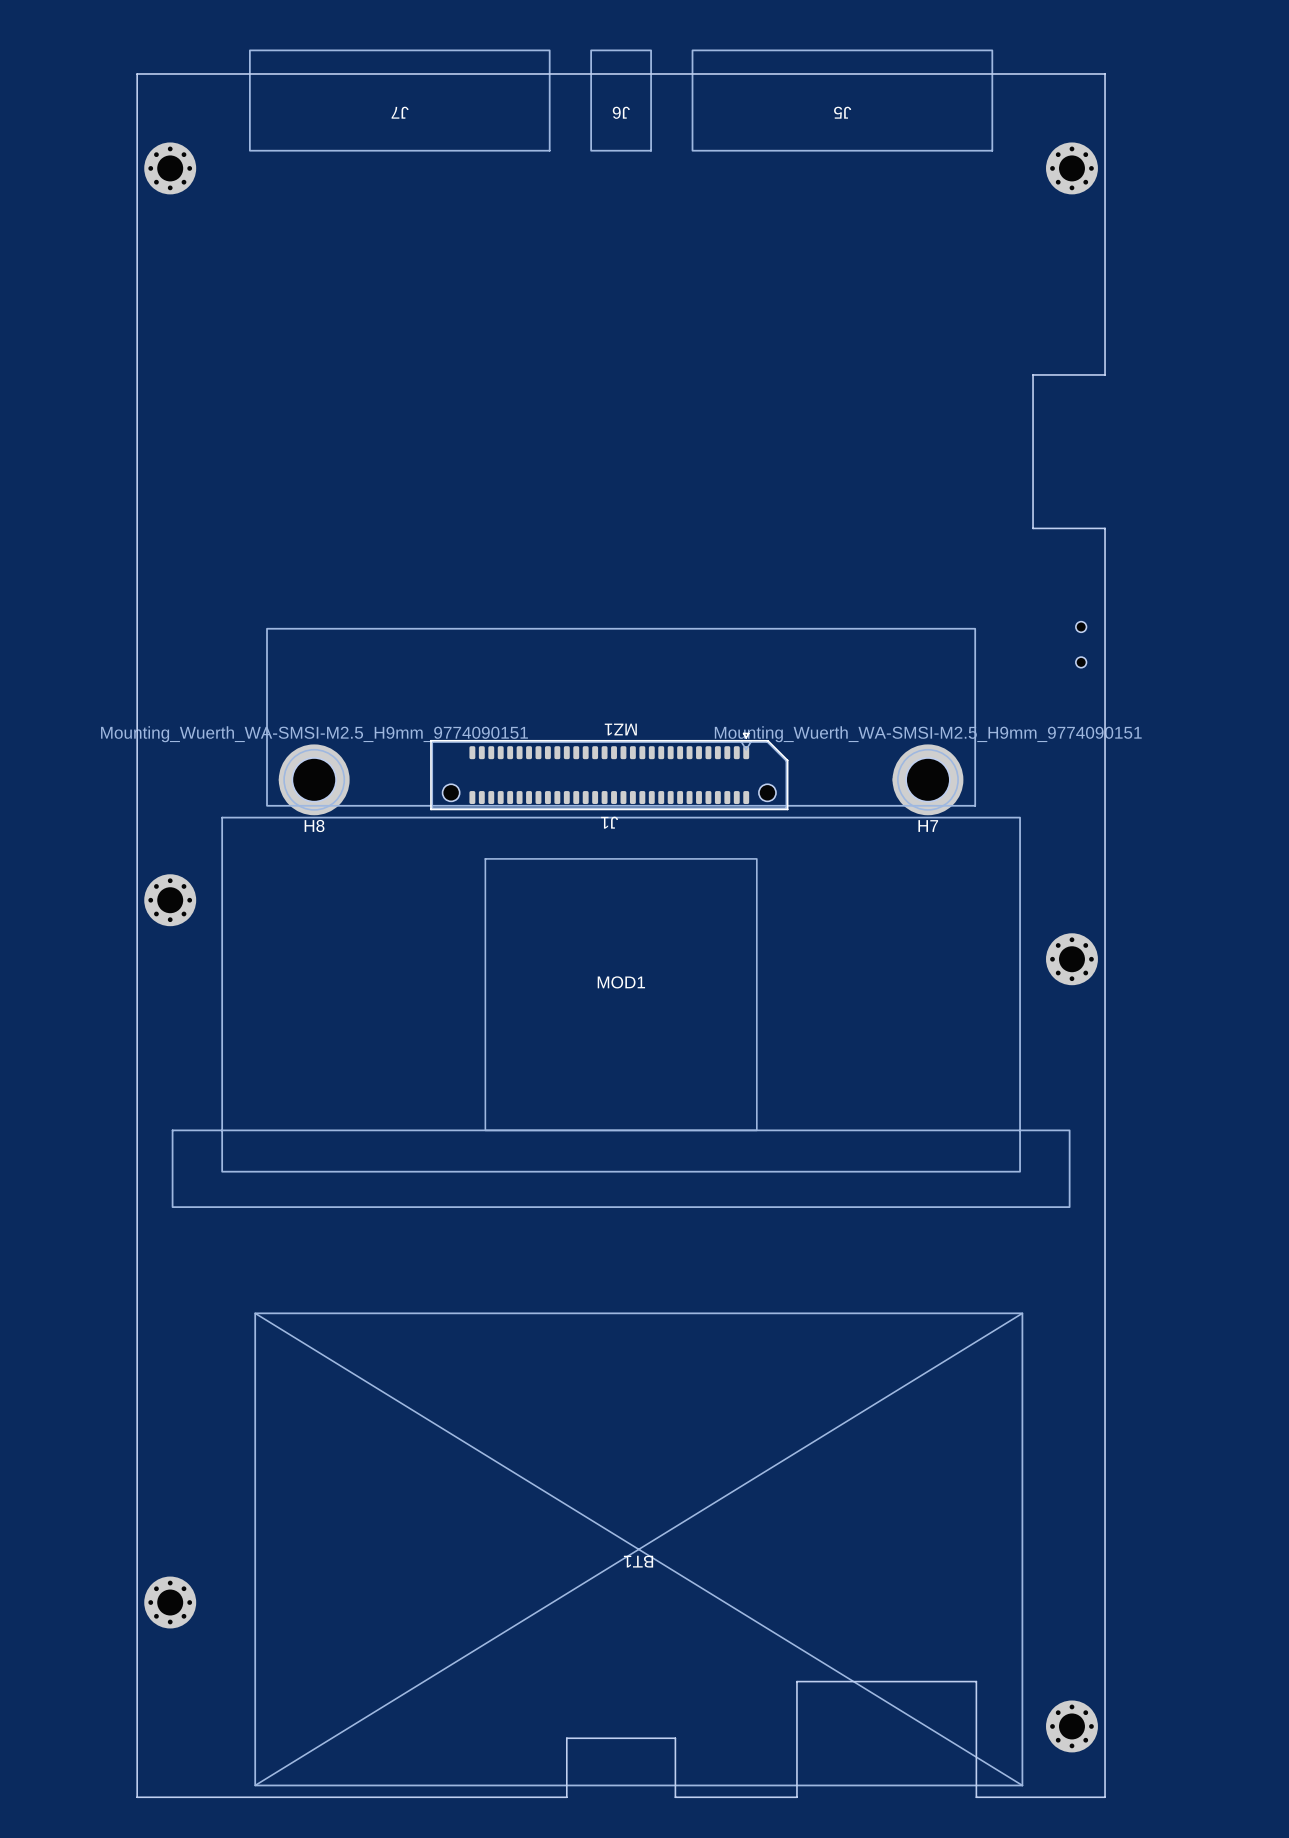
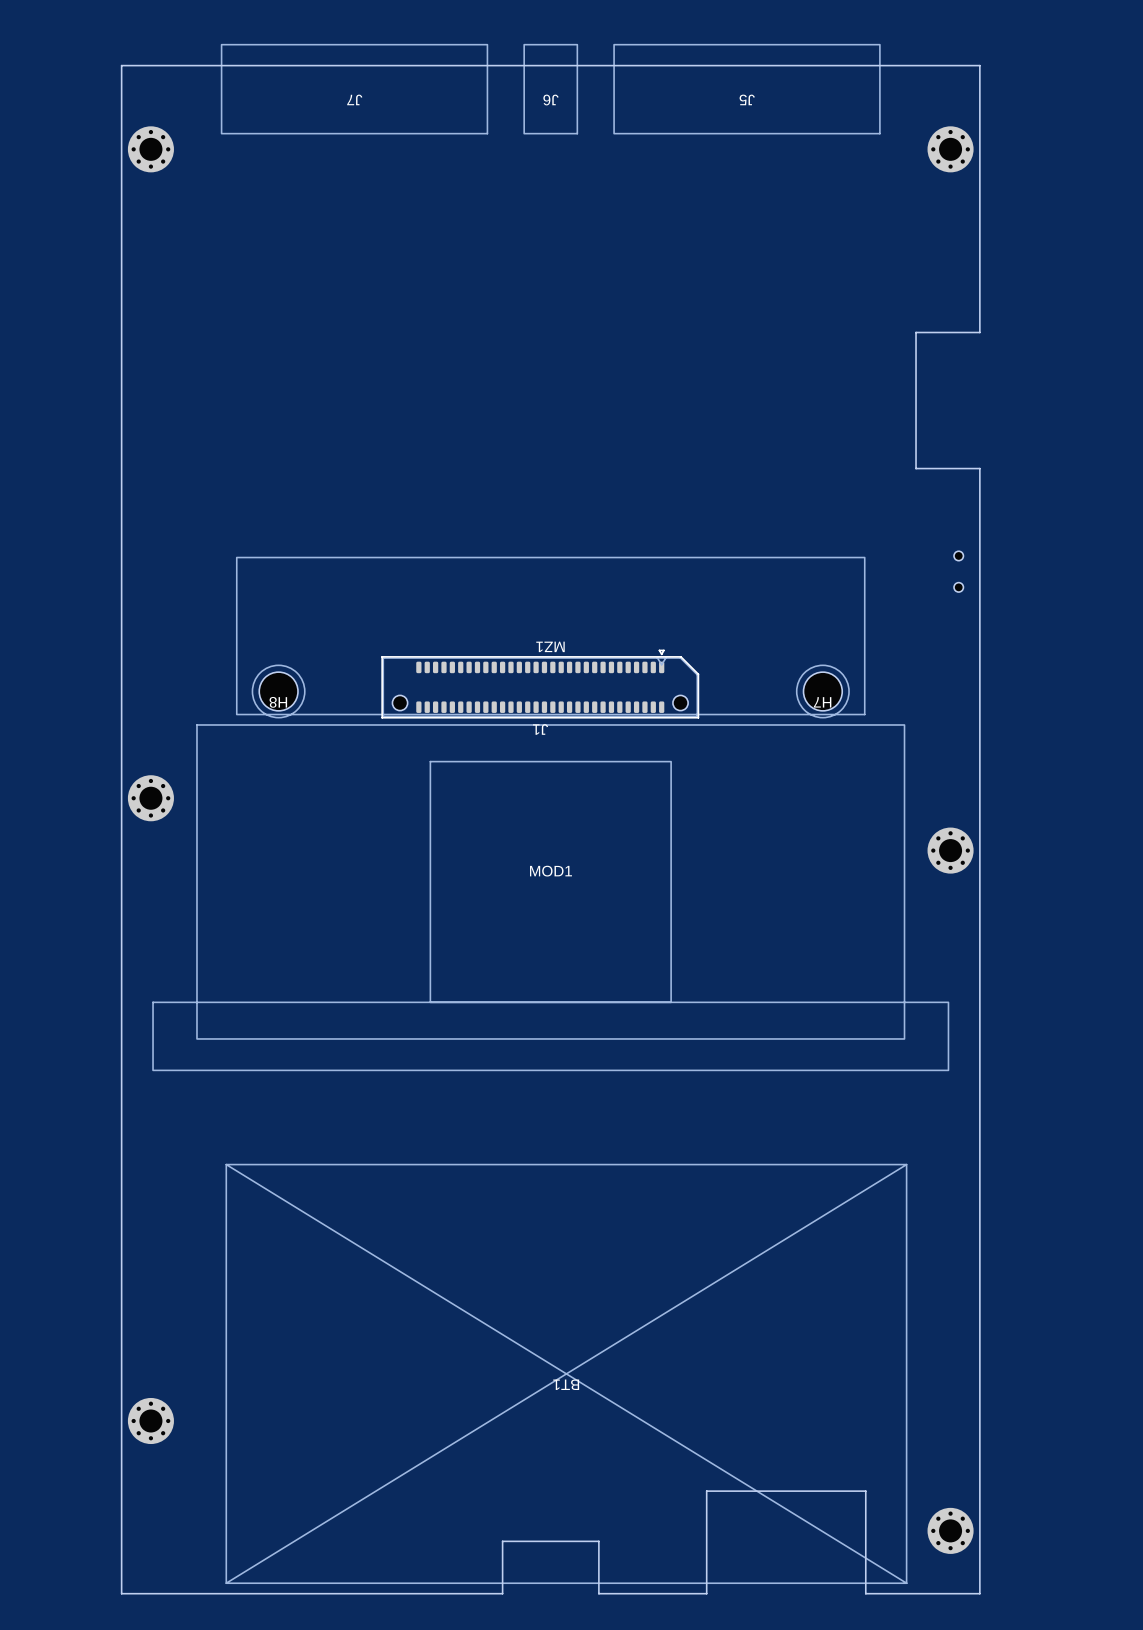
H8 value: Mounting_Wuerth_WA-SMSI-M2.5_H9mm_9774090151 (314, 734) -> none
H7 value: Mounting_Wuerth_WA-SMSI-M2.5_H9mm_9774090151 (928, 734) -> none
H8 footprint: [278, 744, 350, 816] -> [251, 664, 306, 719]
H7 footprint: [892, 744, 964, 816] -> [795, 664, 850, 719]
H8 name position: H8 (314, 826) -> H8 (278, 702)
H7 name position: H7 (928, 826) -> H7 (822, 702)

